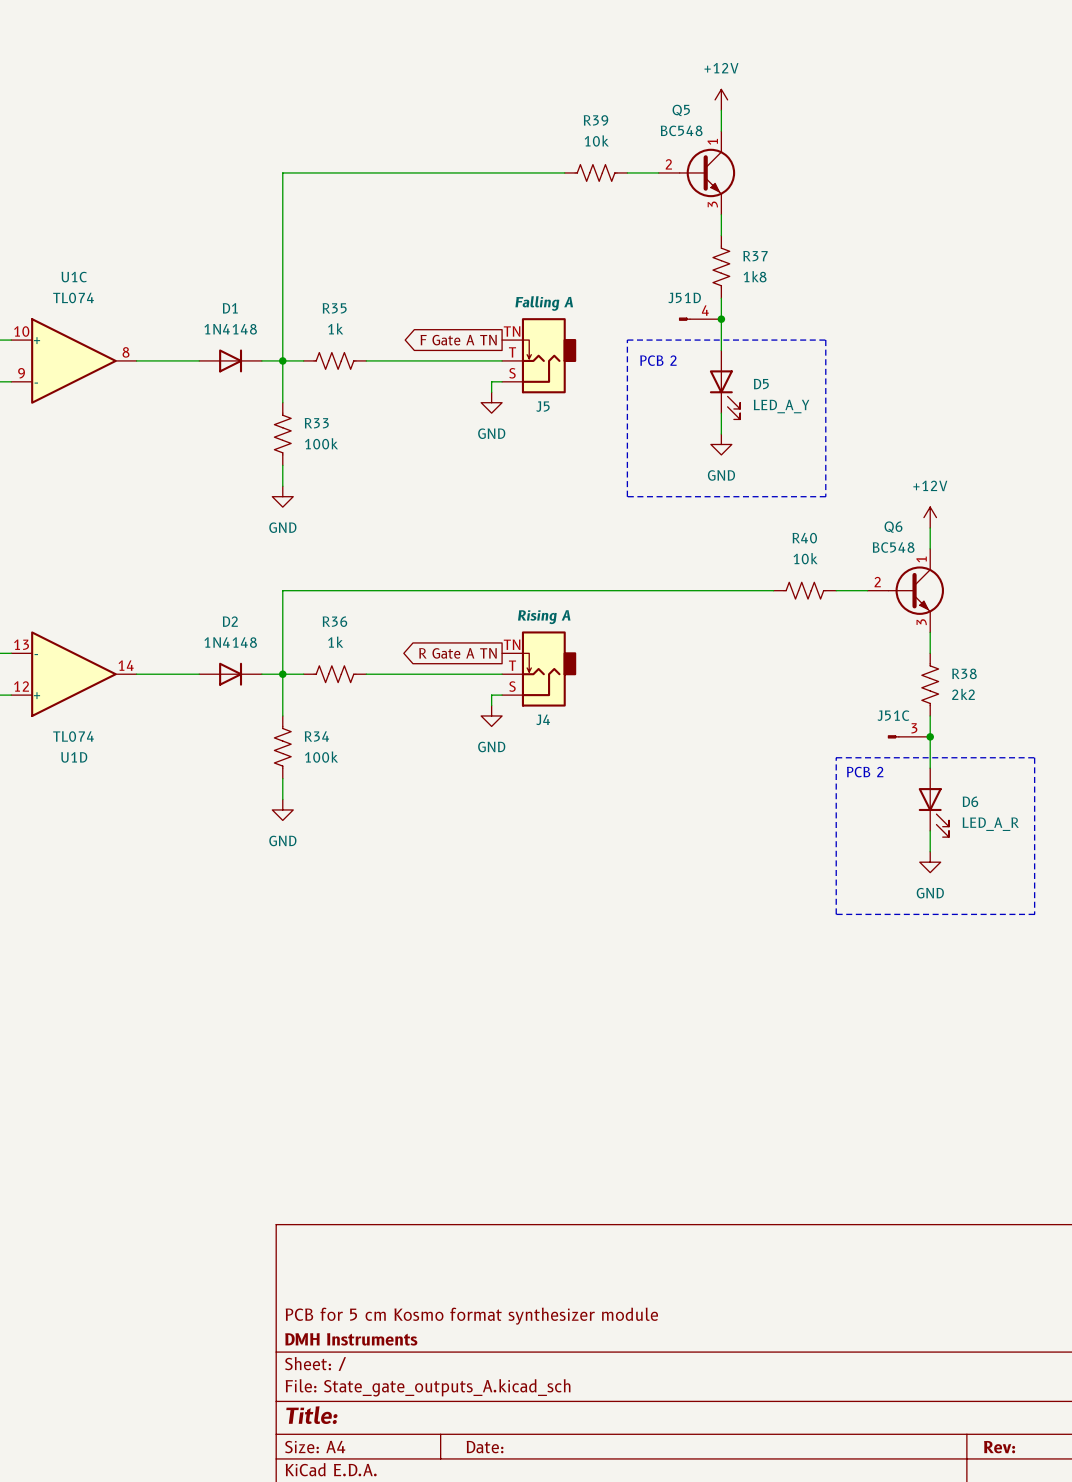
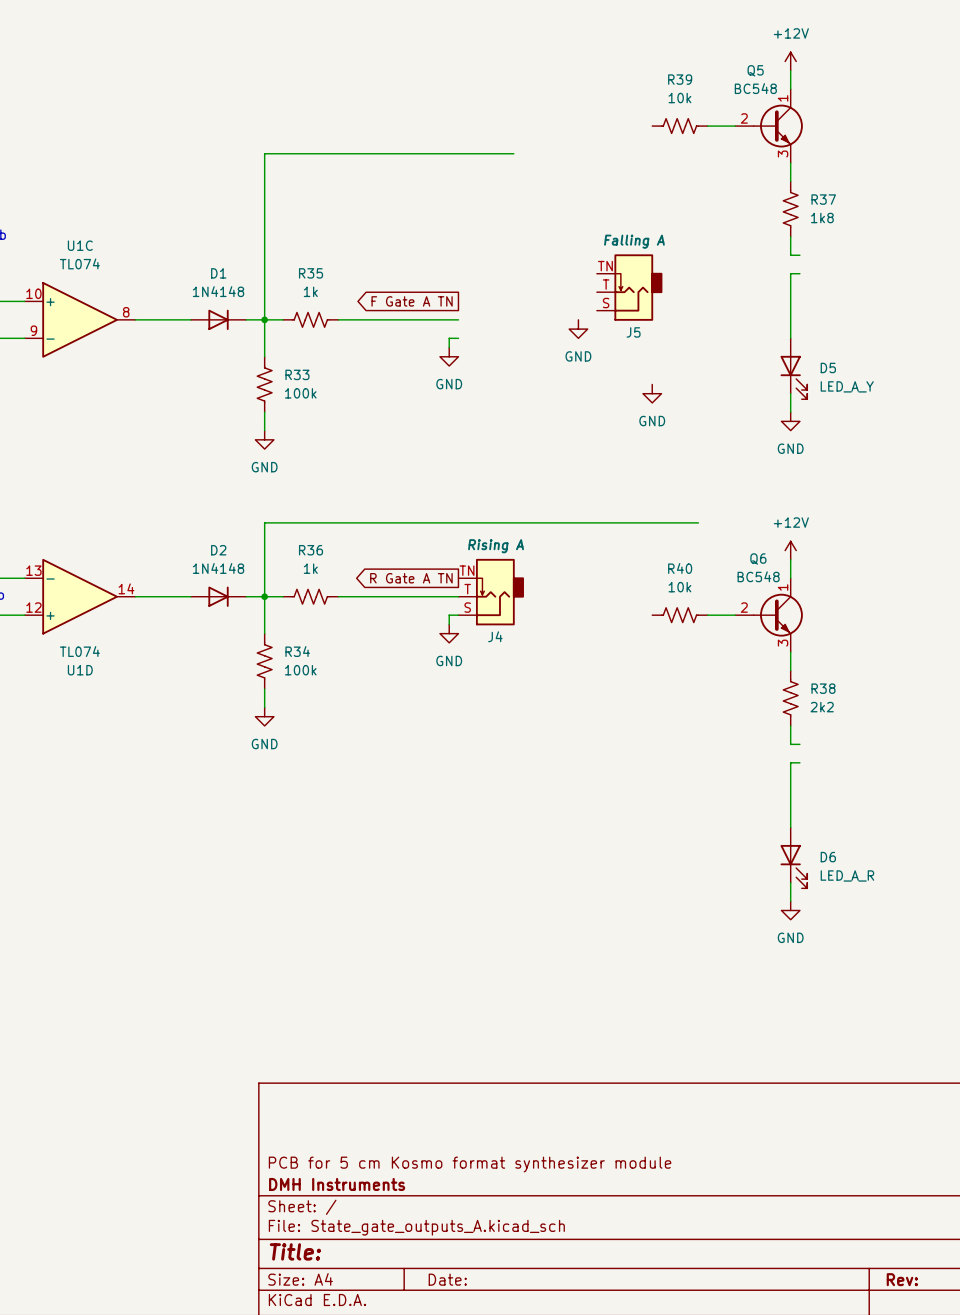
power symbol position: +12V (721, 99) -> +12V (790, 61)
wire: (721, 110) (721, 131) -> (790, 70) (790, 89)
R39 position: (596, 172) -> (679, 126)
wire: (627, 172) (658, 172) -> (707, 126) (735, 126)
Q5 position: (696, 172) -> (769, 126)
wire: (721, 214) (721, 235) -> (790, 162) (790, 181)
R37 position: (721, 266) -> (790, 209)
wire: none -> (790, 236) (790, 255) (799, 255)
wire: none -> (799, 273) (790, 273) (790, 338)
J51D: (700, 319) -> none
junction: (721, 319) -> none
line: (627, 340) (825, 340) (825, 496) (627, 496) (627, 340) -> none
J5 position: (539, 355) -> (629, 287)
text: PCB 2 (658, 360) -> none
power symbol: none -> GND (578, 329)
D5 position: (725, 384) -> (793, 368)
wire: (721, 413) (721, 434) -> (790, 393) (790, 412)
power symbol: none -> GND (790, 421)
power symbol position: +12V (930, 517) -> +12V (790, 550)
wire: (930, 528) (930, 548) -> (790, 559) (790, 578)
R40 position: (804, 590) -> (679, 615)
wire: (836, 590) (867, 590) -> (707, 615) (735, 615)
Q6 position: (905, 590) -> (769, 615)
wire: (930, 632) (930, 653) -> (790, 652) (790, 670)
R38 position: (930, 684) -> (790, 698)
wire: (930, 715) (930, 768) -> none
J51C: (909, 736) -> none
junction: (930, 736) -> none
line: (836, 757) (1034, 757) (1034, 914) (836, 914) (836, 757) -> none
text: PCB 2 (865, 772) -> none
D6 position: (933, 802) -> (793, 857)
wire: none -> (790, 725) (790, 744) (799, 744)
wire: (930, 830) (930, 851) -> (790, 882) (790, 901)
wire: none -> (799, 762) (790, 762) (790, 827)
power symbol position: GND (930, 862) -> GND (790, 910)

